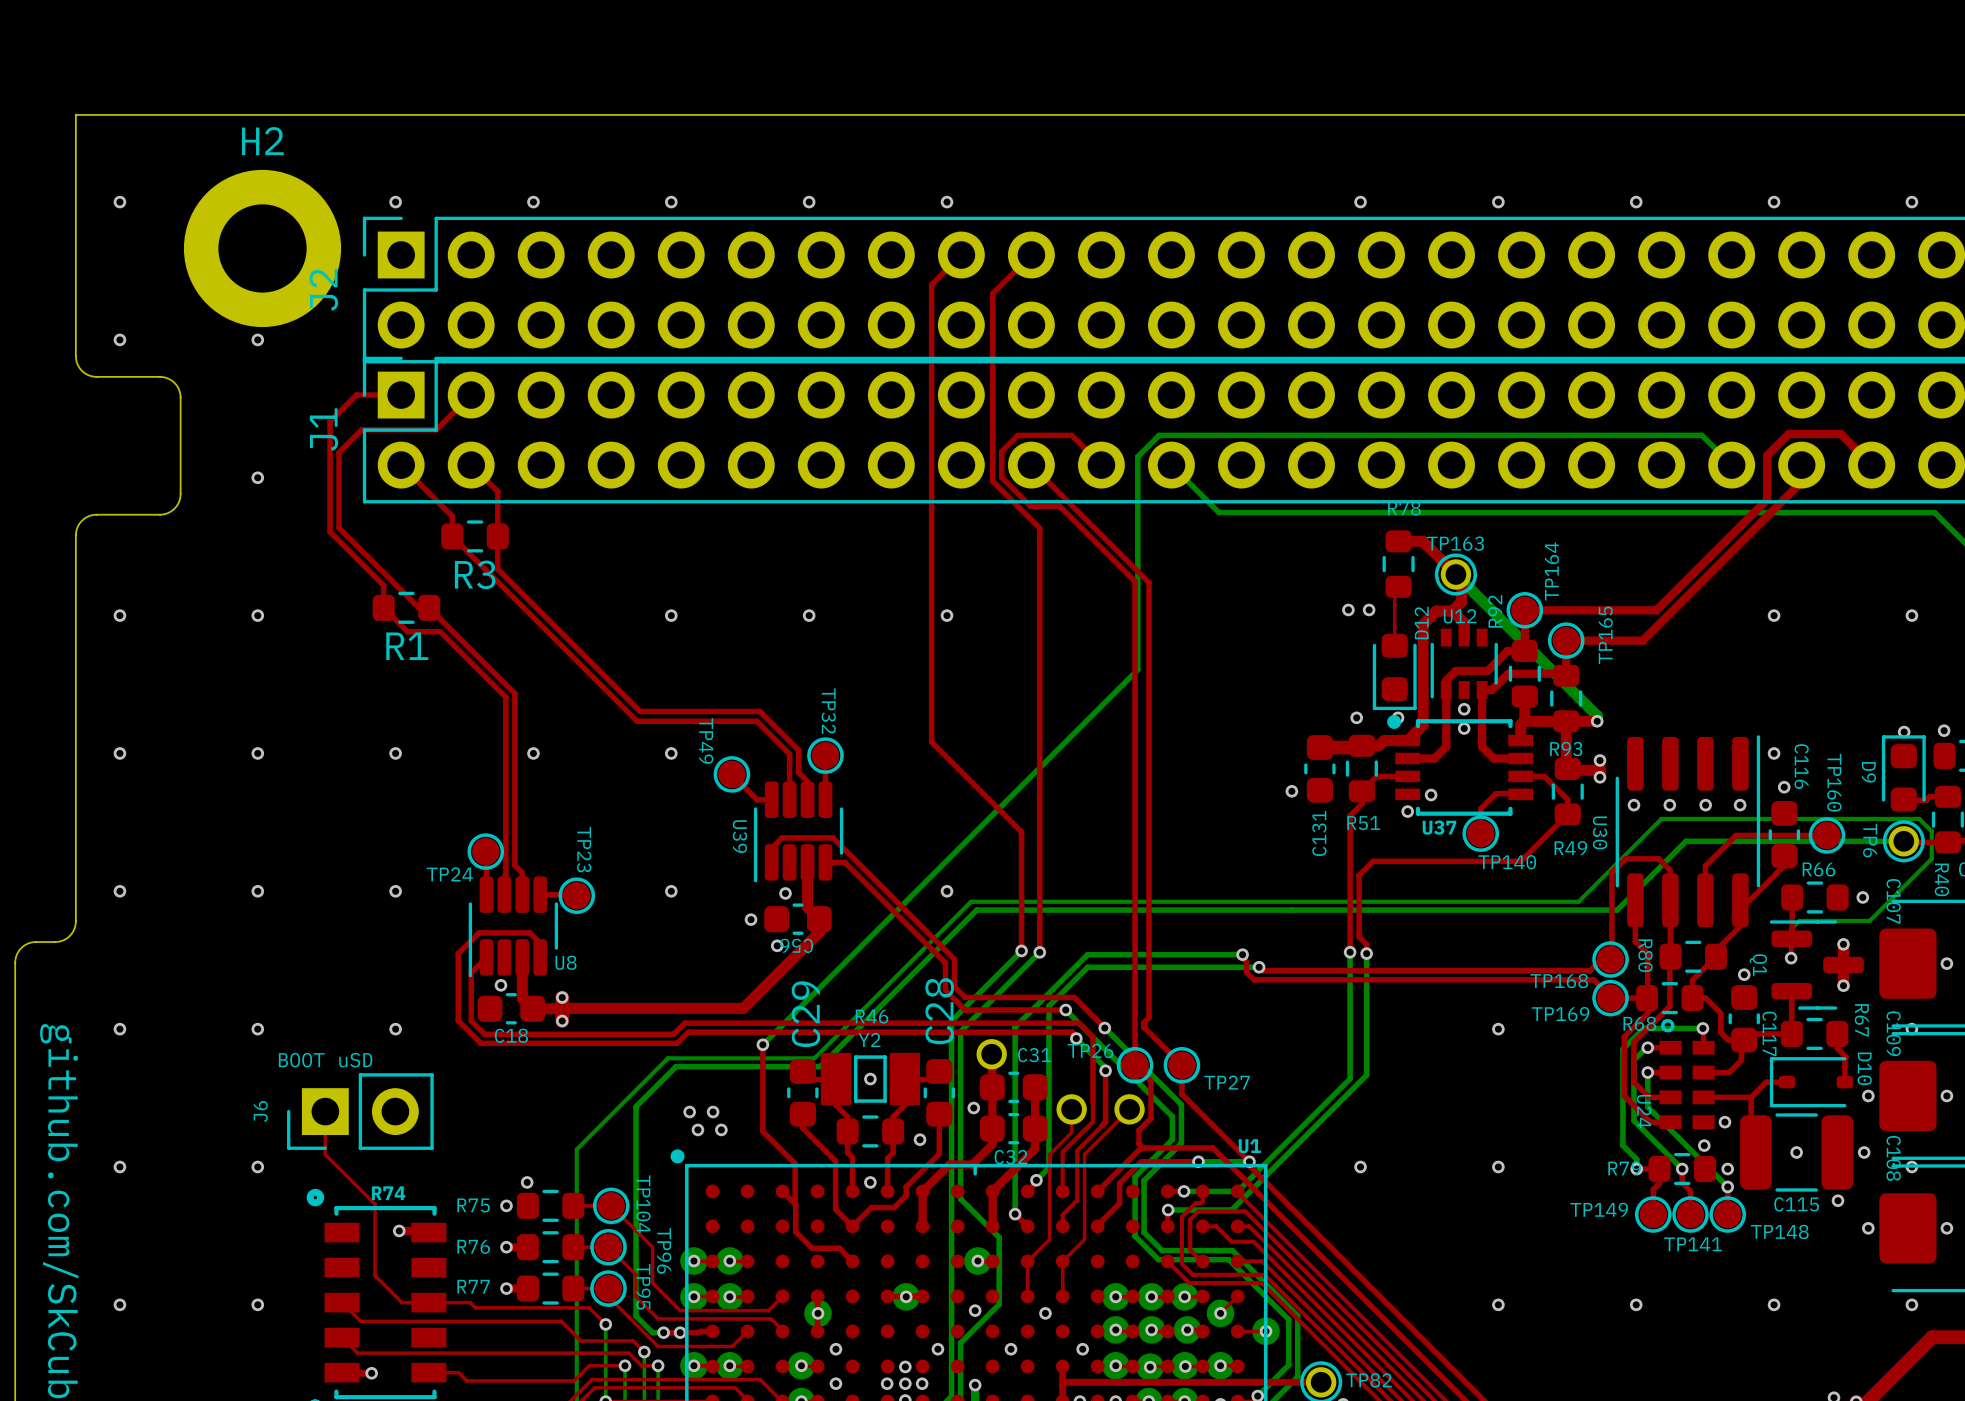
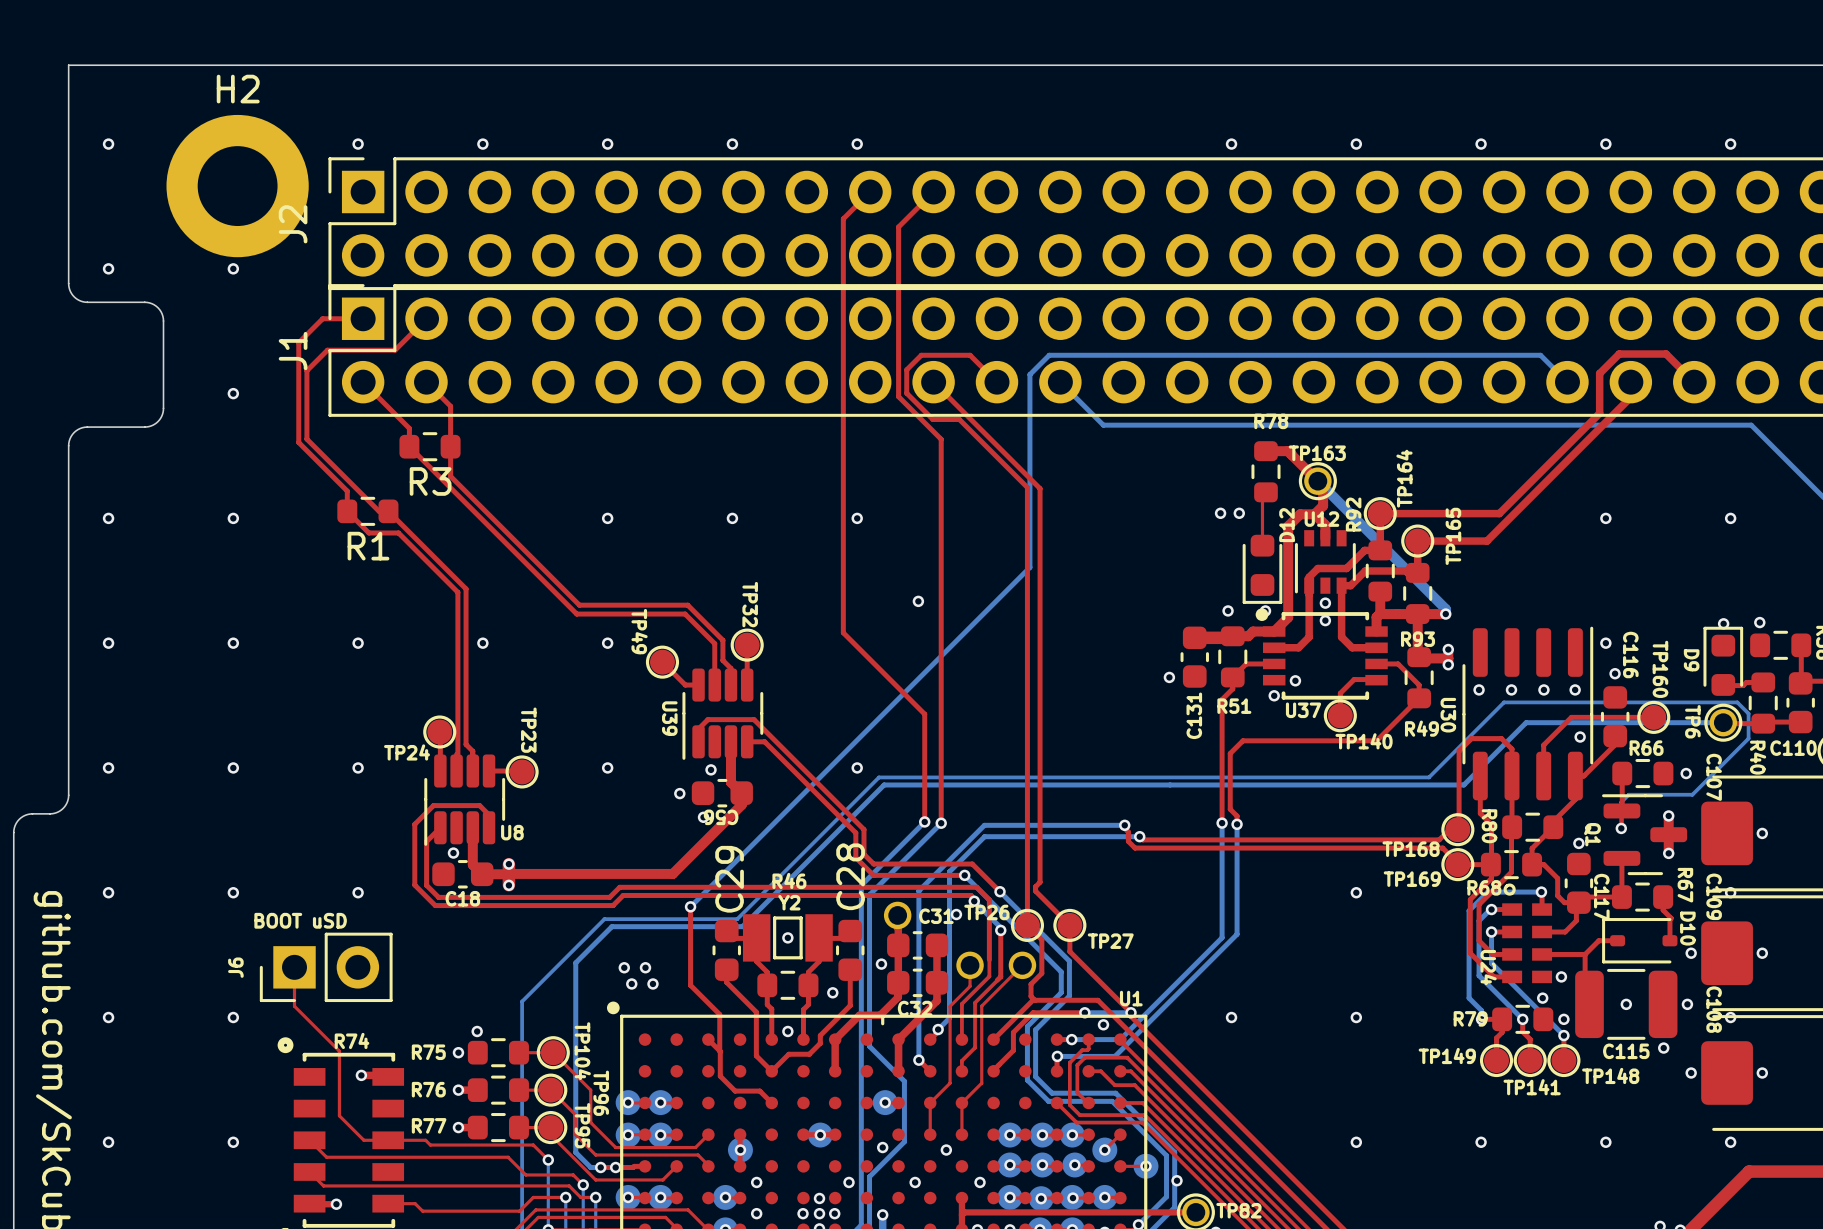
via: none -> (918, 601)
via: none -> (1580, 737)
via: none -> (956, 914)
via: none -> (1103, 1024)
via: none -> (1177, 1180)

